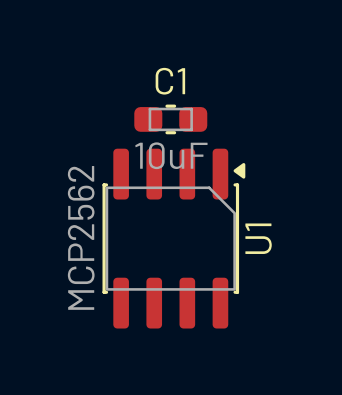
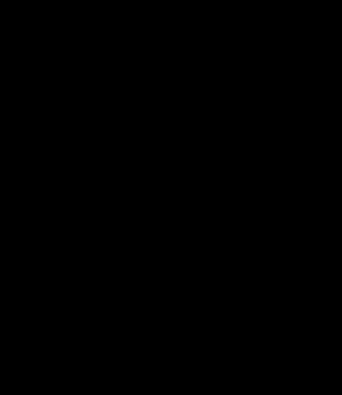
C1: 10uF (170, 119) -> none
U1: MCP2562 (173, 238) -> none

